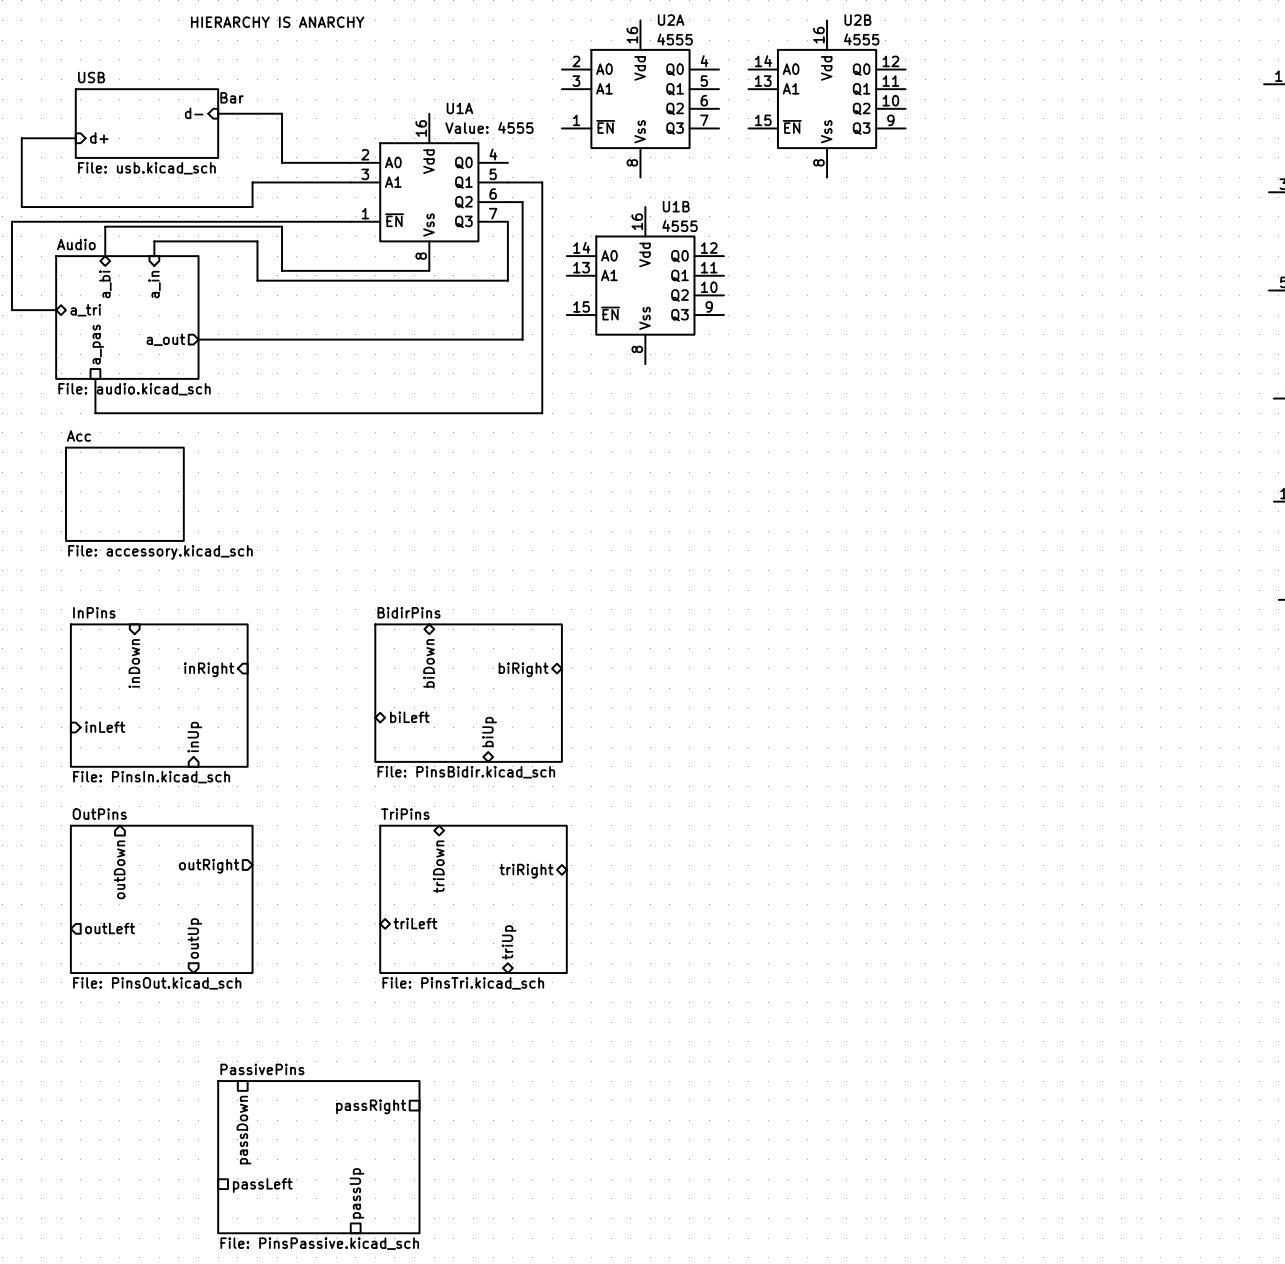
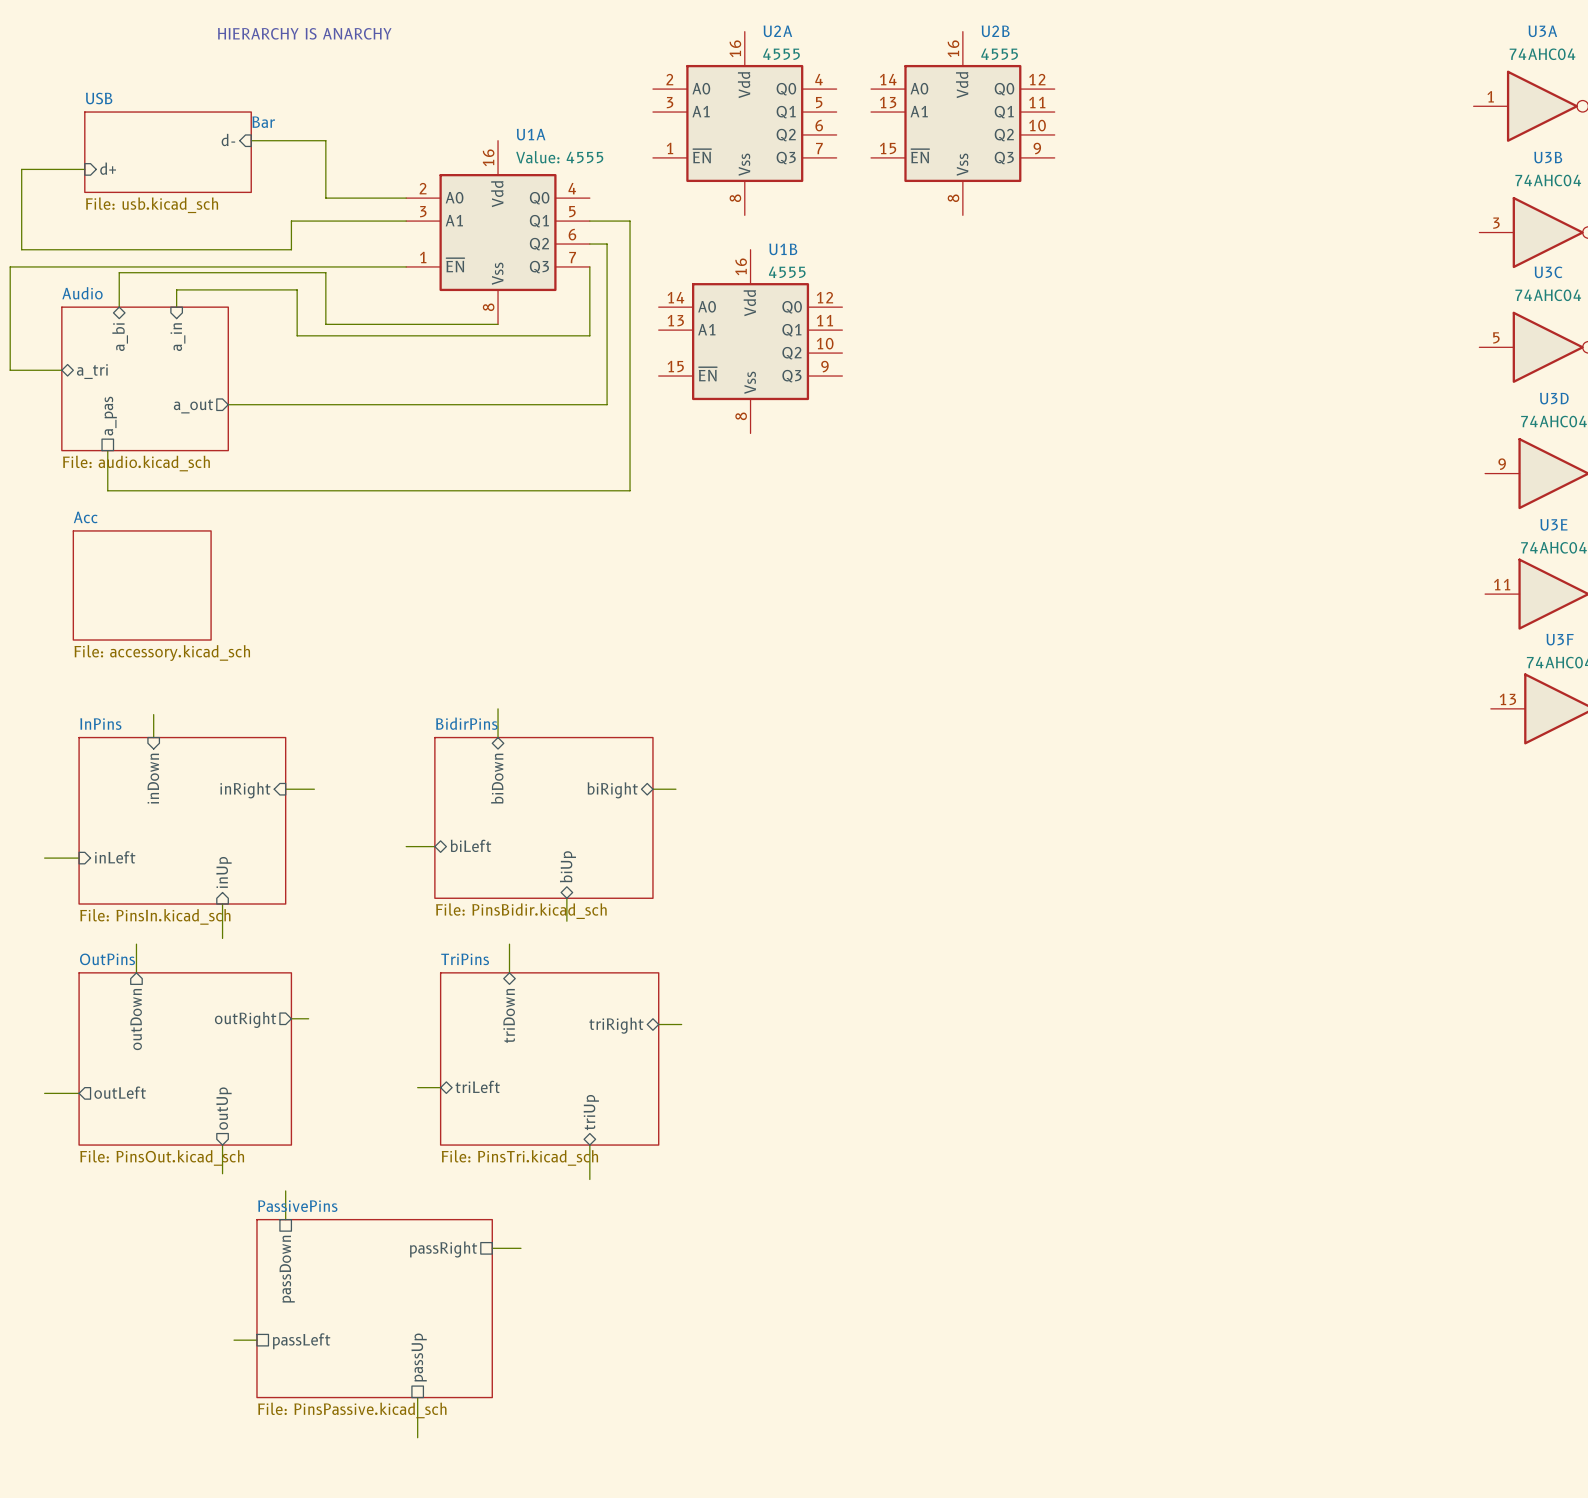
wire: none -> (498, 708) (498, 737)
wire: none -> (153, 714) (153, 737)
wire: none -> (285, 789) (314, 789)
wire: none -> (652, 789) (675, 789)
wire: none -> (406, 846) (434, 846)
wire: none -> (44, 858) (79, 858)
wire: none -> (566, 898) (566, 921)
wire: none -> (222, 903) (222, 938)
wire: none -> (136, 944) (136, 972)
wire: none -> (509, 944) (509, 972)
wire: none -> (291, 1018) (308, 1018)
wire: none -> (658, 1024) (681, 1024)
wire: none -> (417, 1087) (440, 1087)
wire: none -> (44, 1093) (79, 1093)
wire: none -> (222, 1145) (222, 1173)
wire: none -> (589, 1145) (589, 1179)
wire: none -> (285, 1190) (285, 1219)
wire: none -> (492, 1248) (520, 1248)
sheet pin position: passRight (371, 1106) -> passRight (443, 1249)
sheet pin position: passDown (244, 1130) -> passDown (287, 1269)
wire: none -> (234, 1340) (256, 1340)
sheet PassivePins position: (318, 1157) -> (374, 1308)
sheet pin position: passLeft (262, 1185) -> passLeft (301, 1341)
wire: none -> (417, 1397) (417, 1437)
sheet pin position: passUp (356, 1193) -> passUp (419, 1357)

